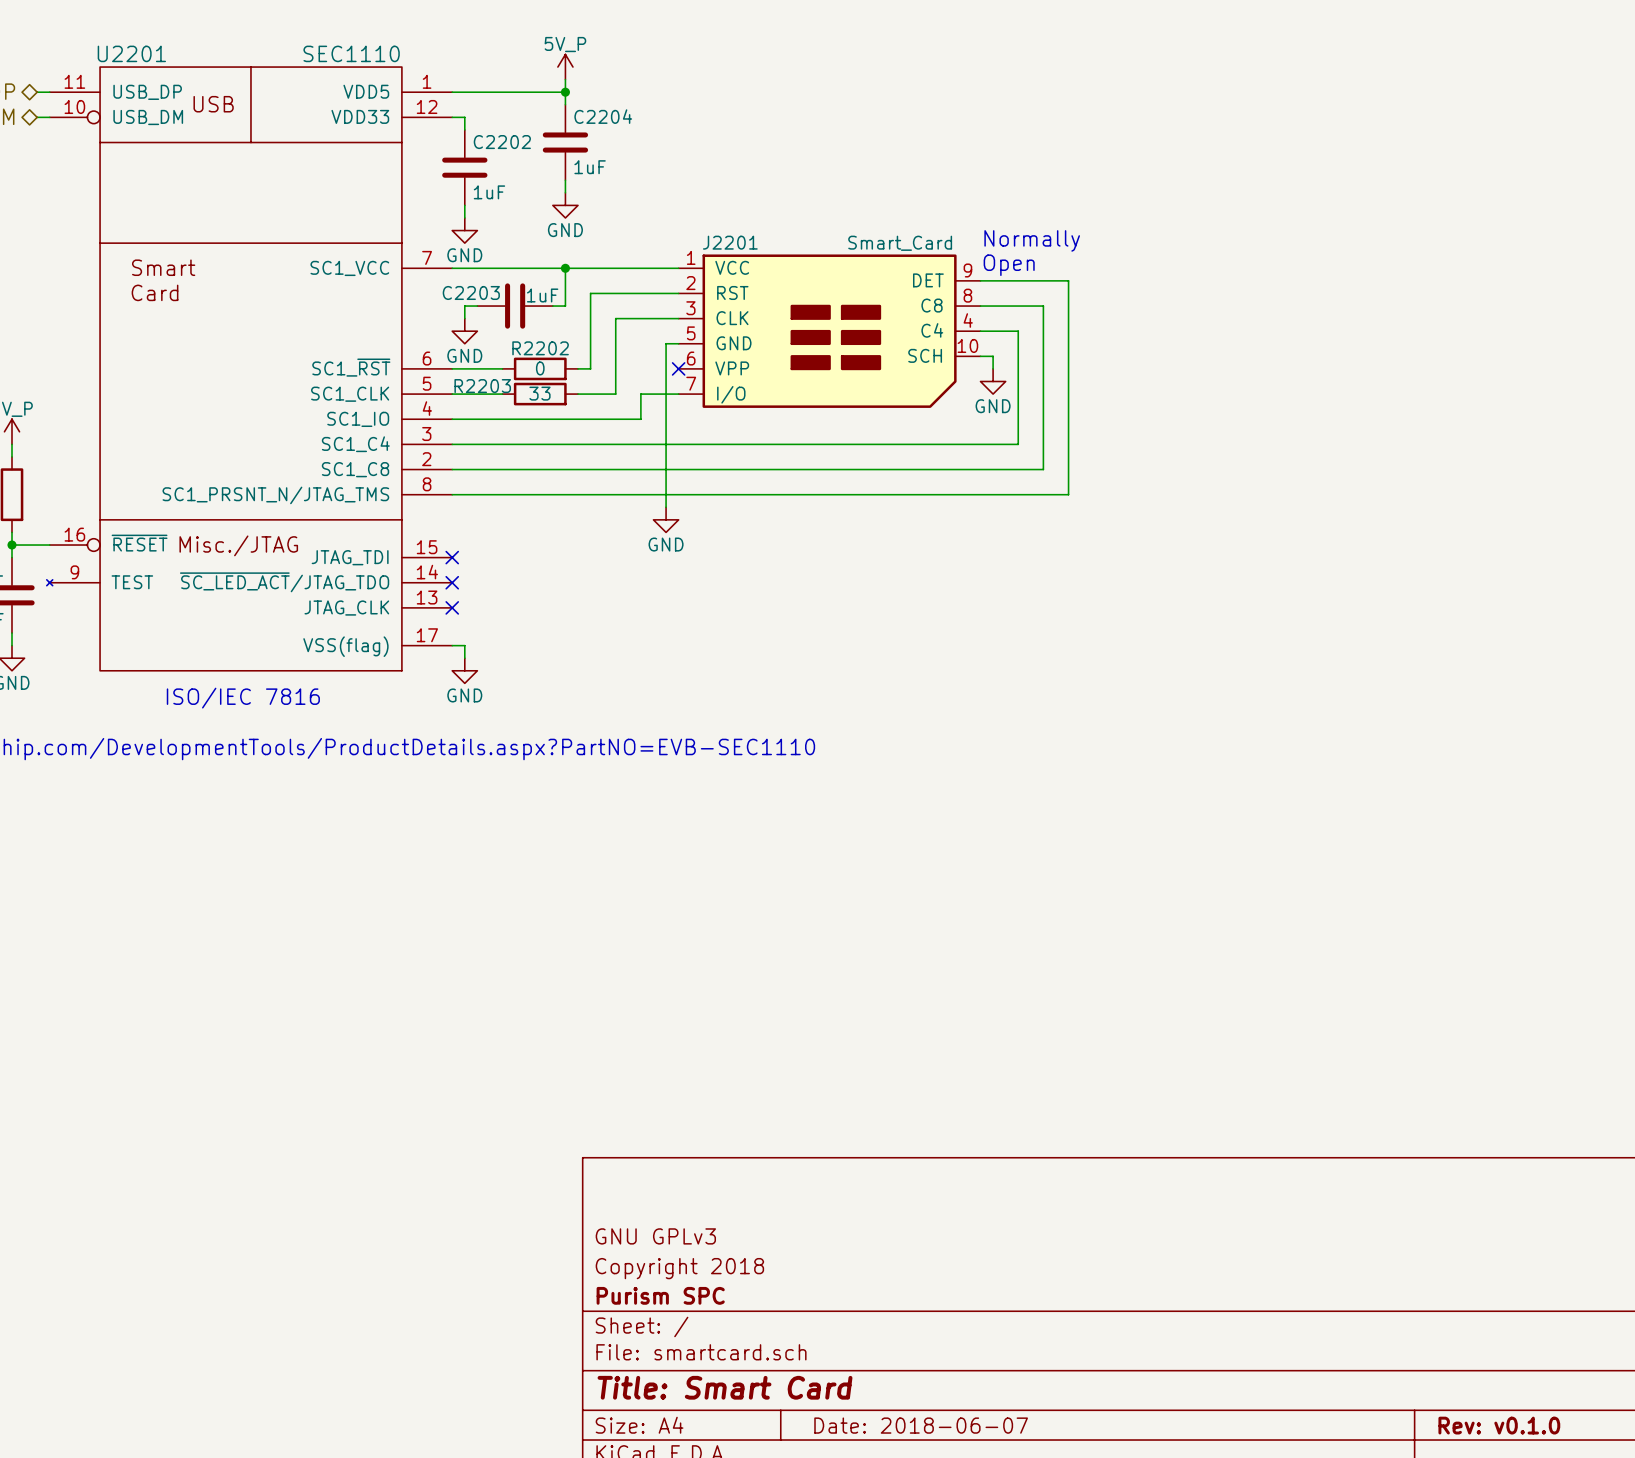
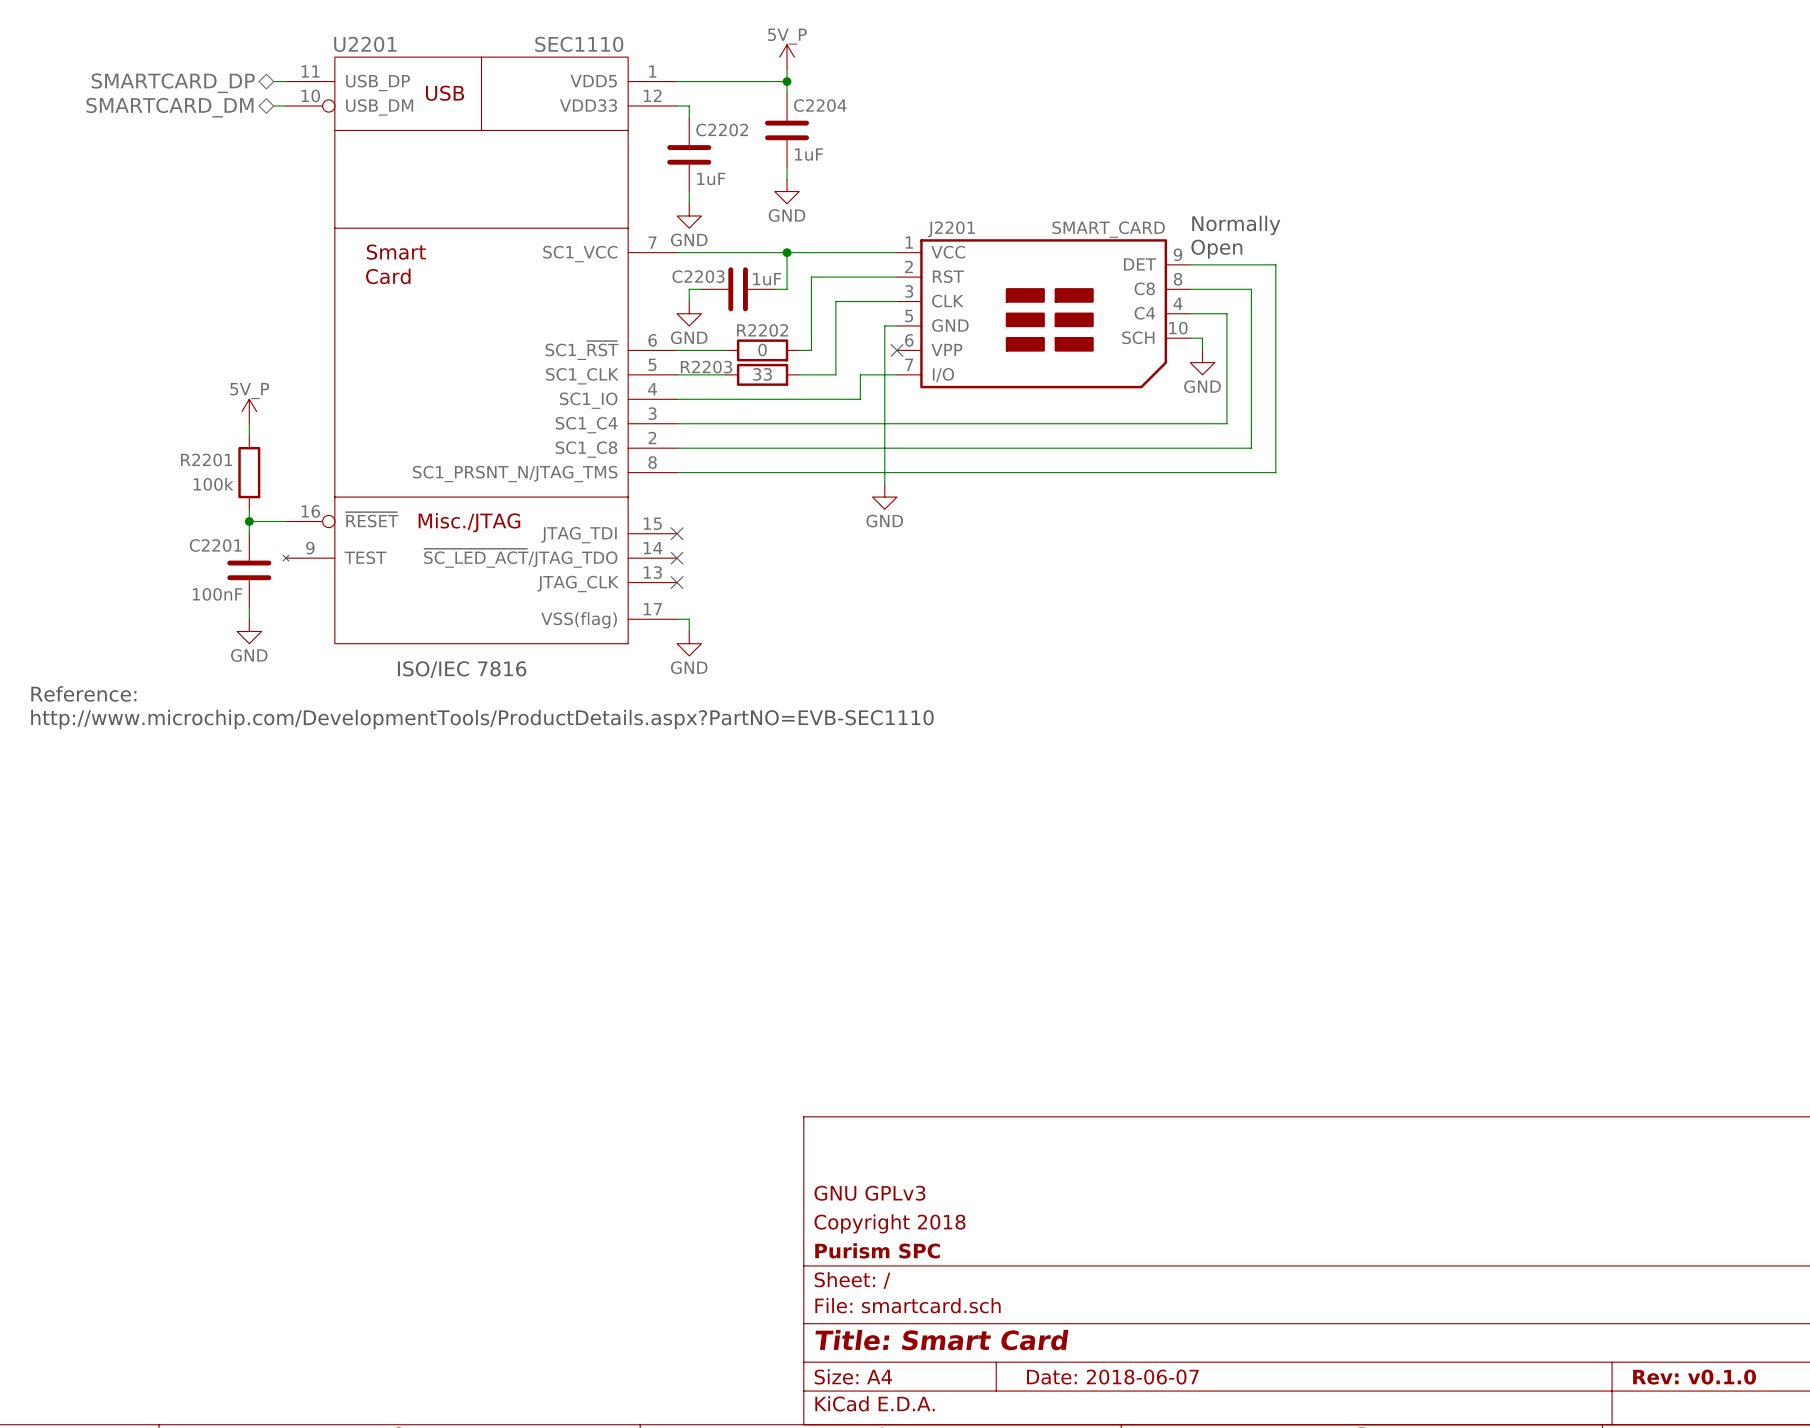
J2201 value: Smart_Card (900, 243) -> SMART_CARD (1108, 229)

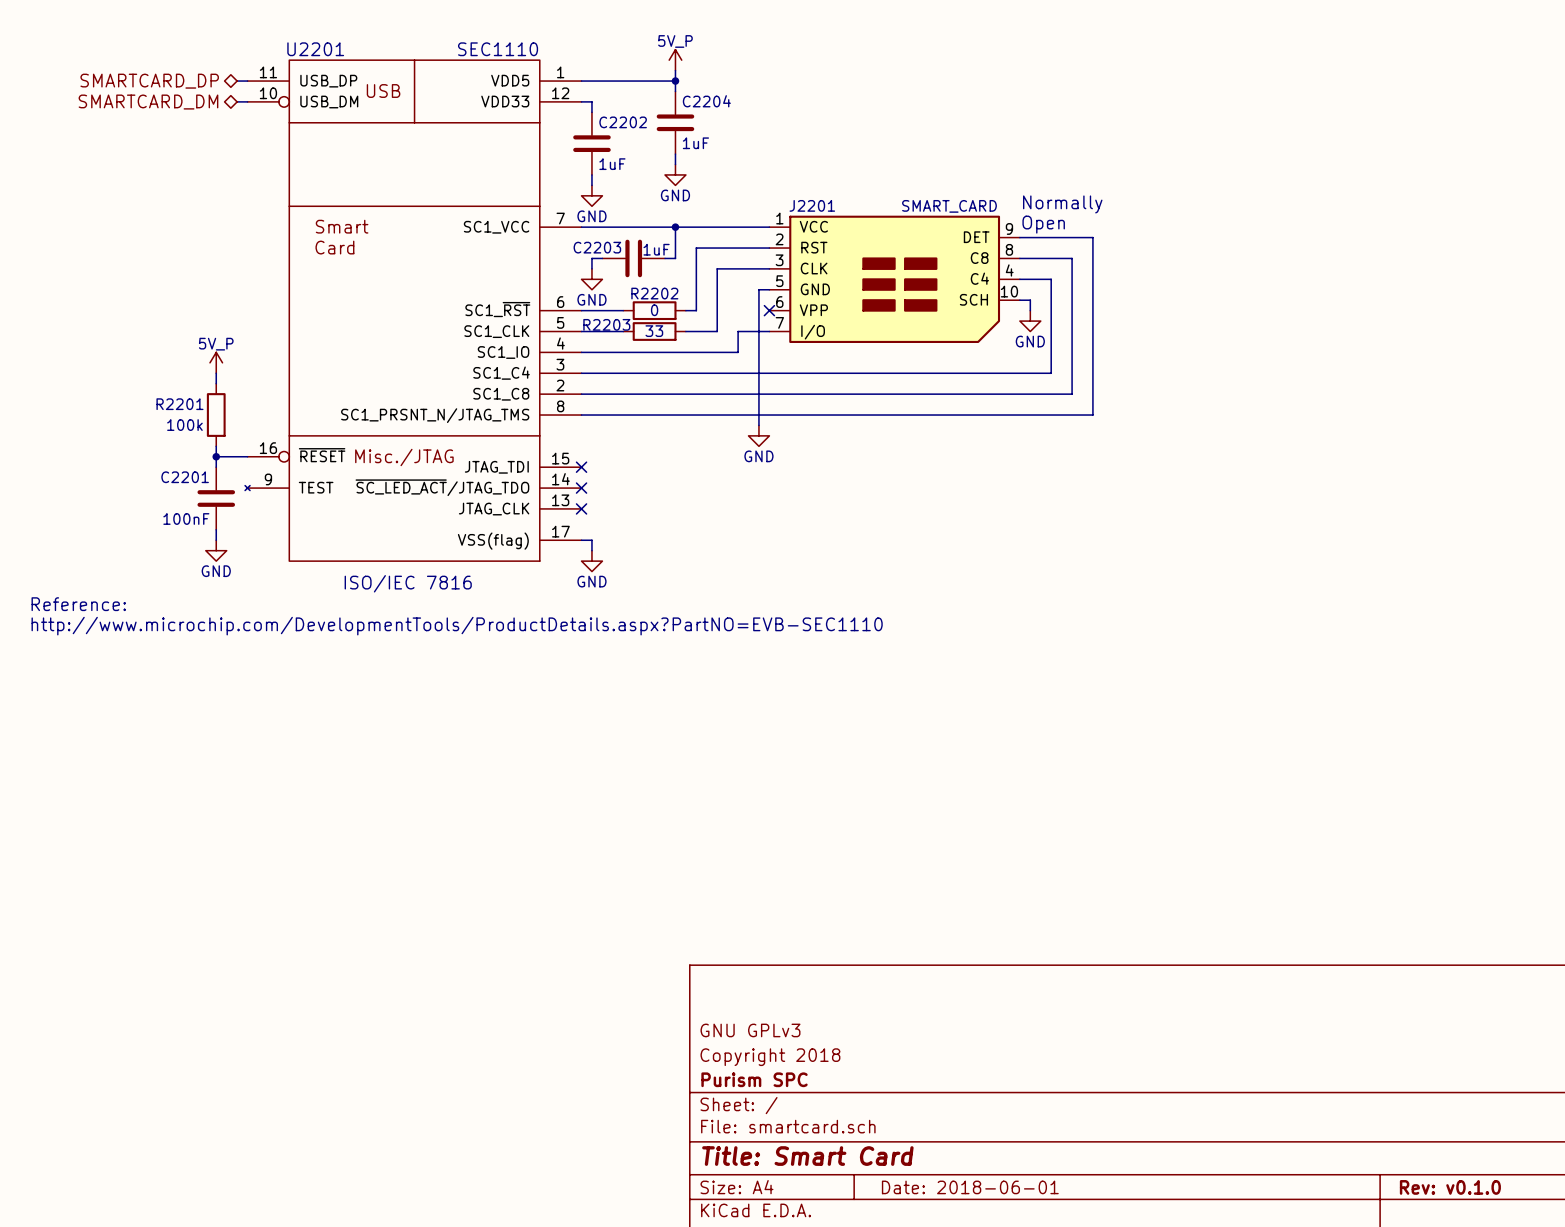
title block: Date: 2018-06-07 (1112, 1377) -> Date: 2018-06-01 (970, 1187)

